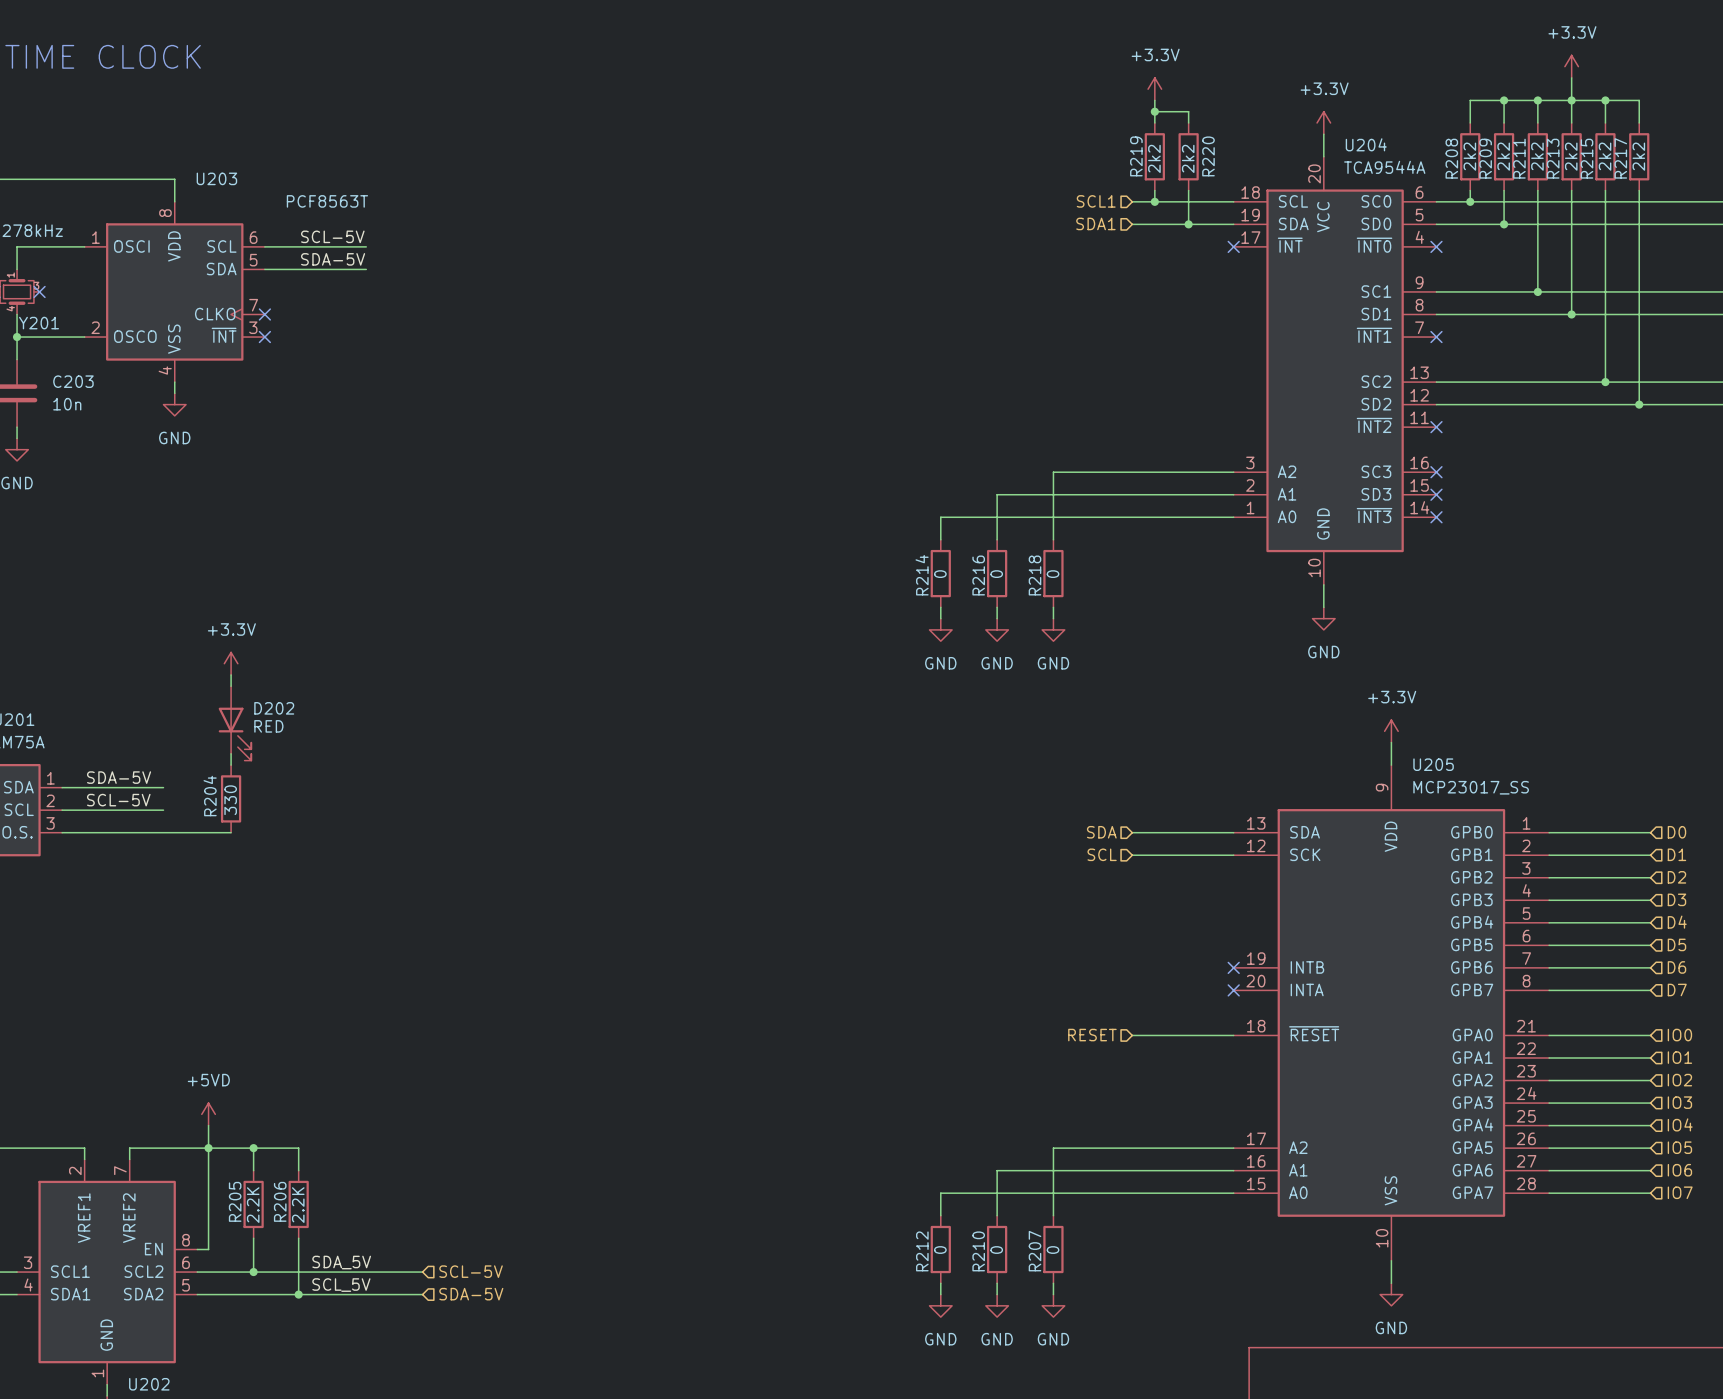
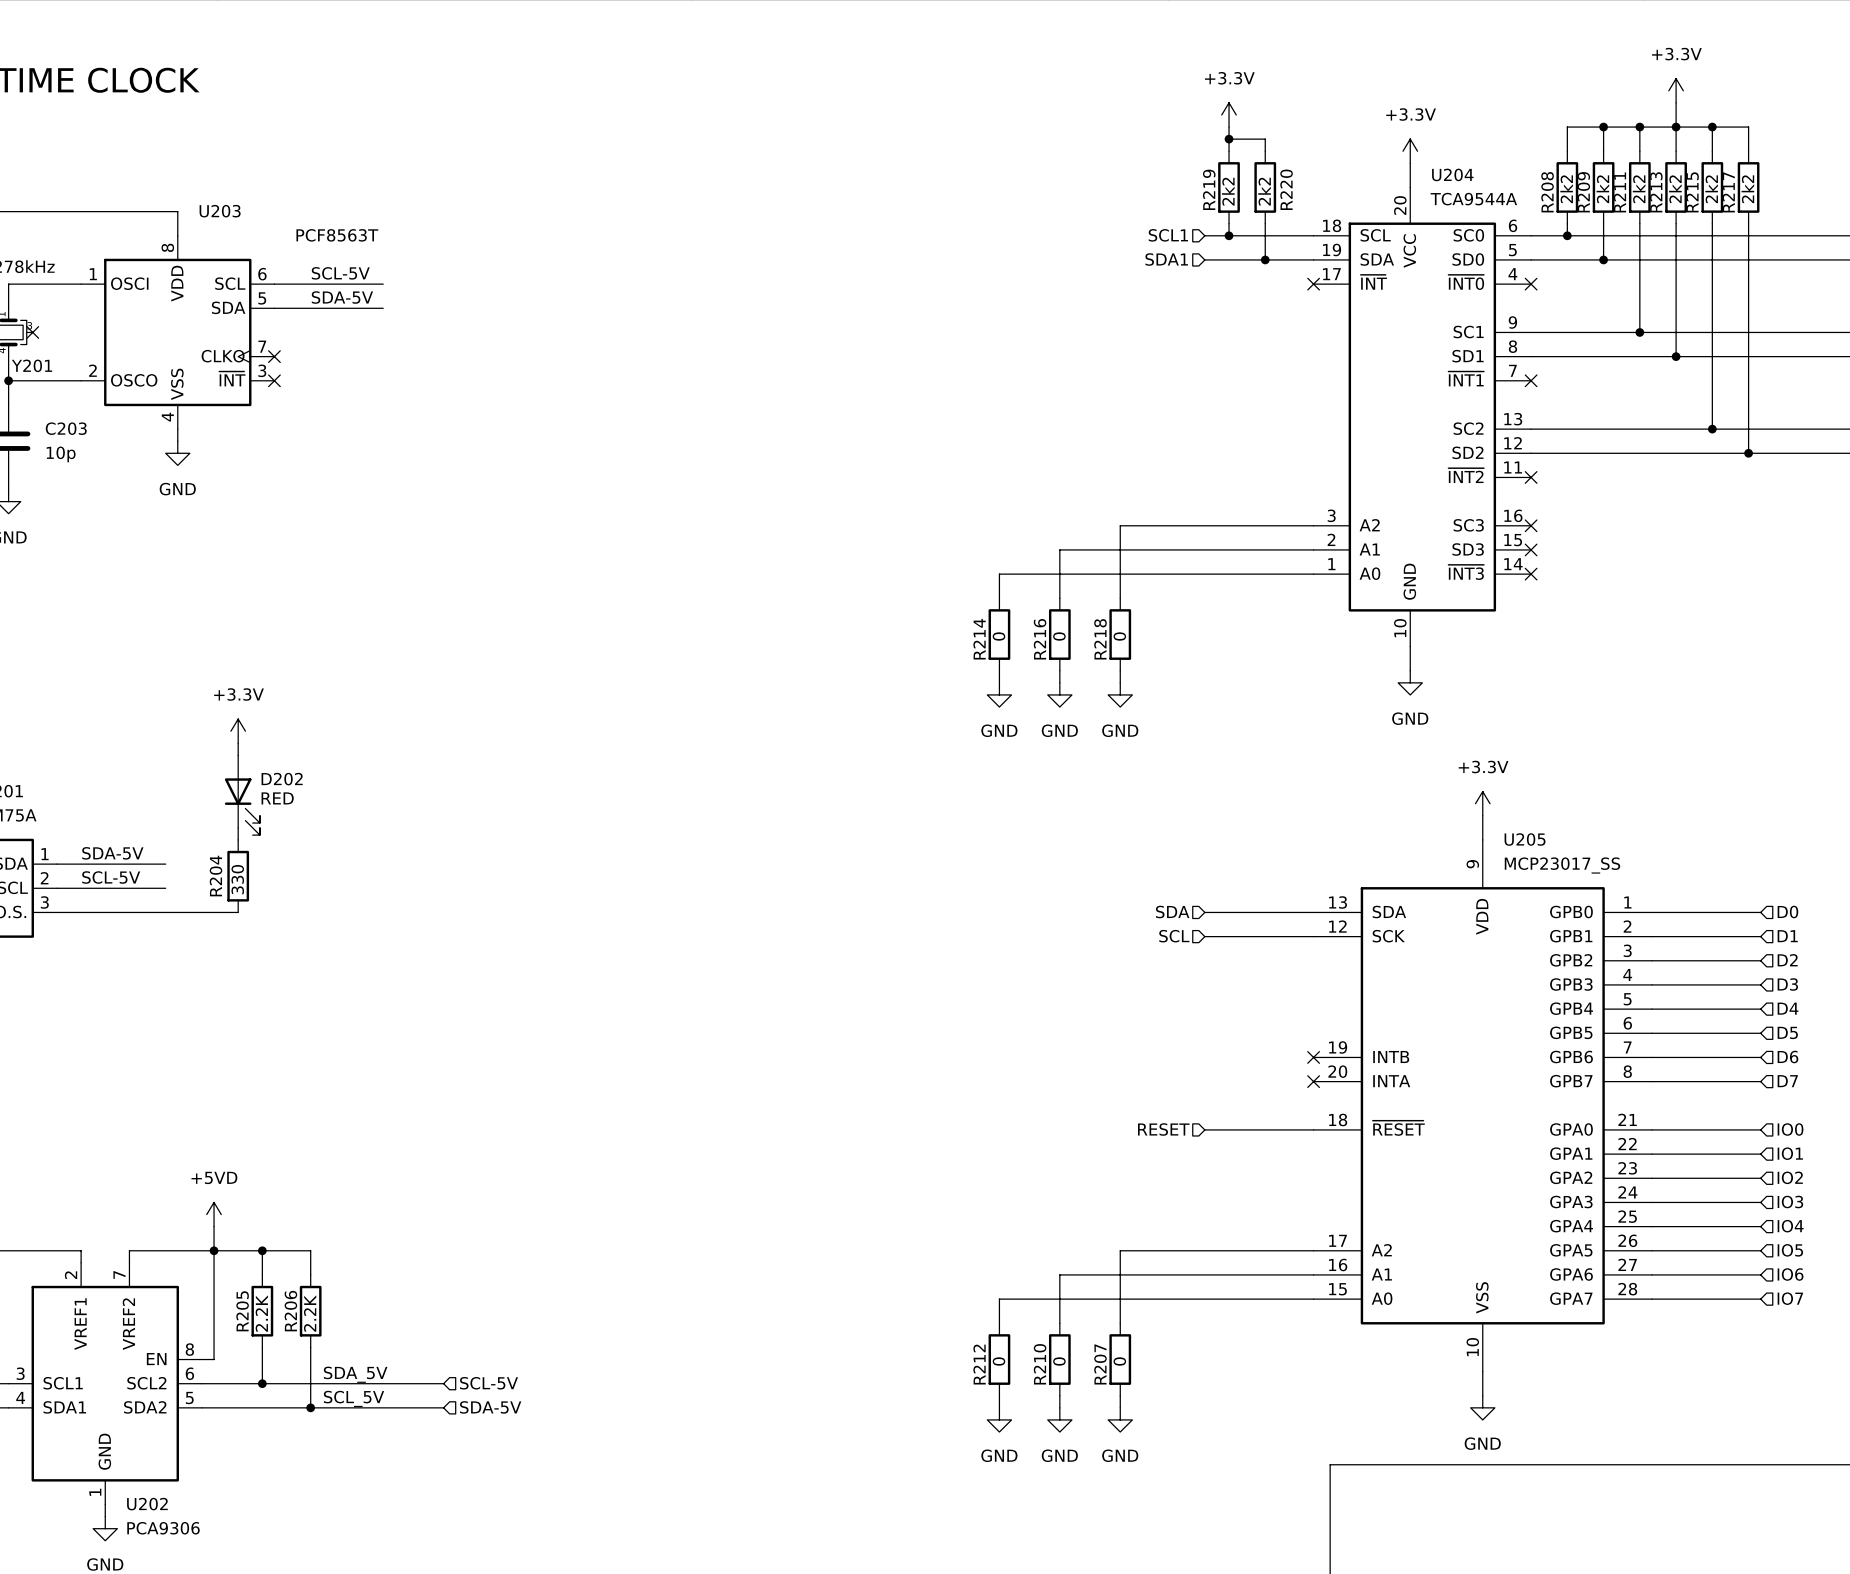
C203 value: 10n (67, 404) -> 10p (61, 454)

